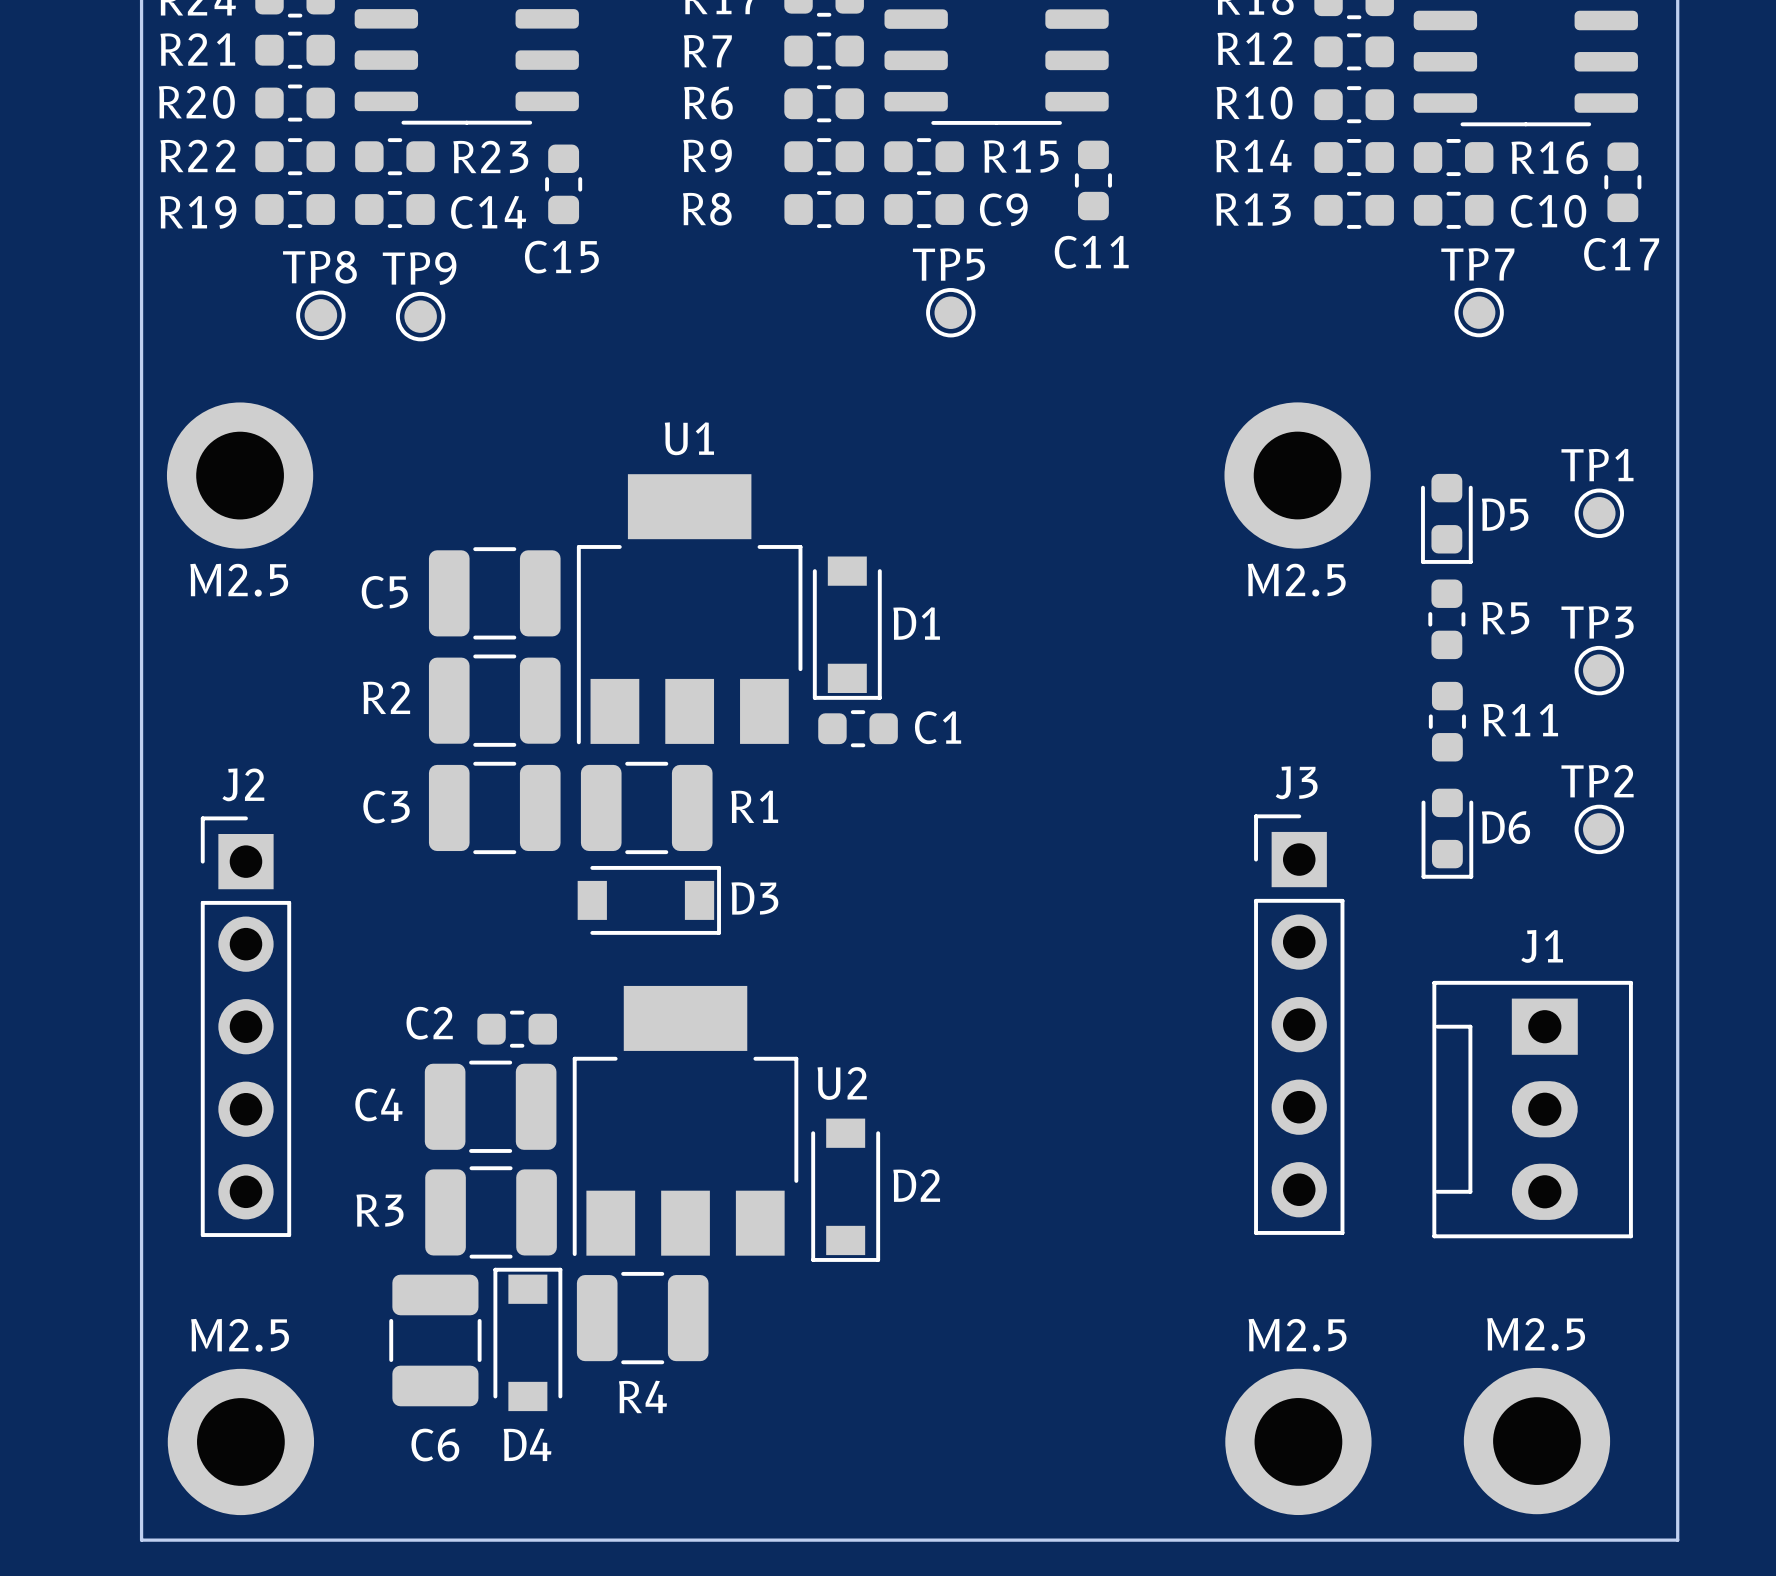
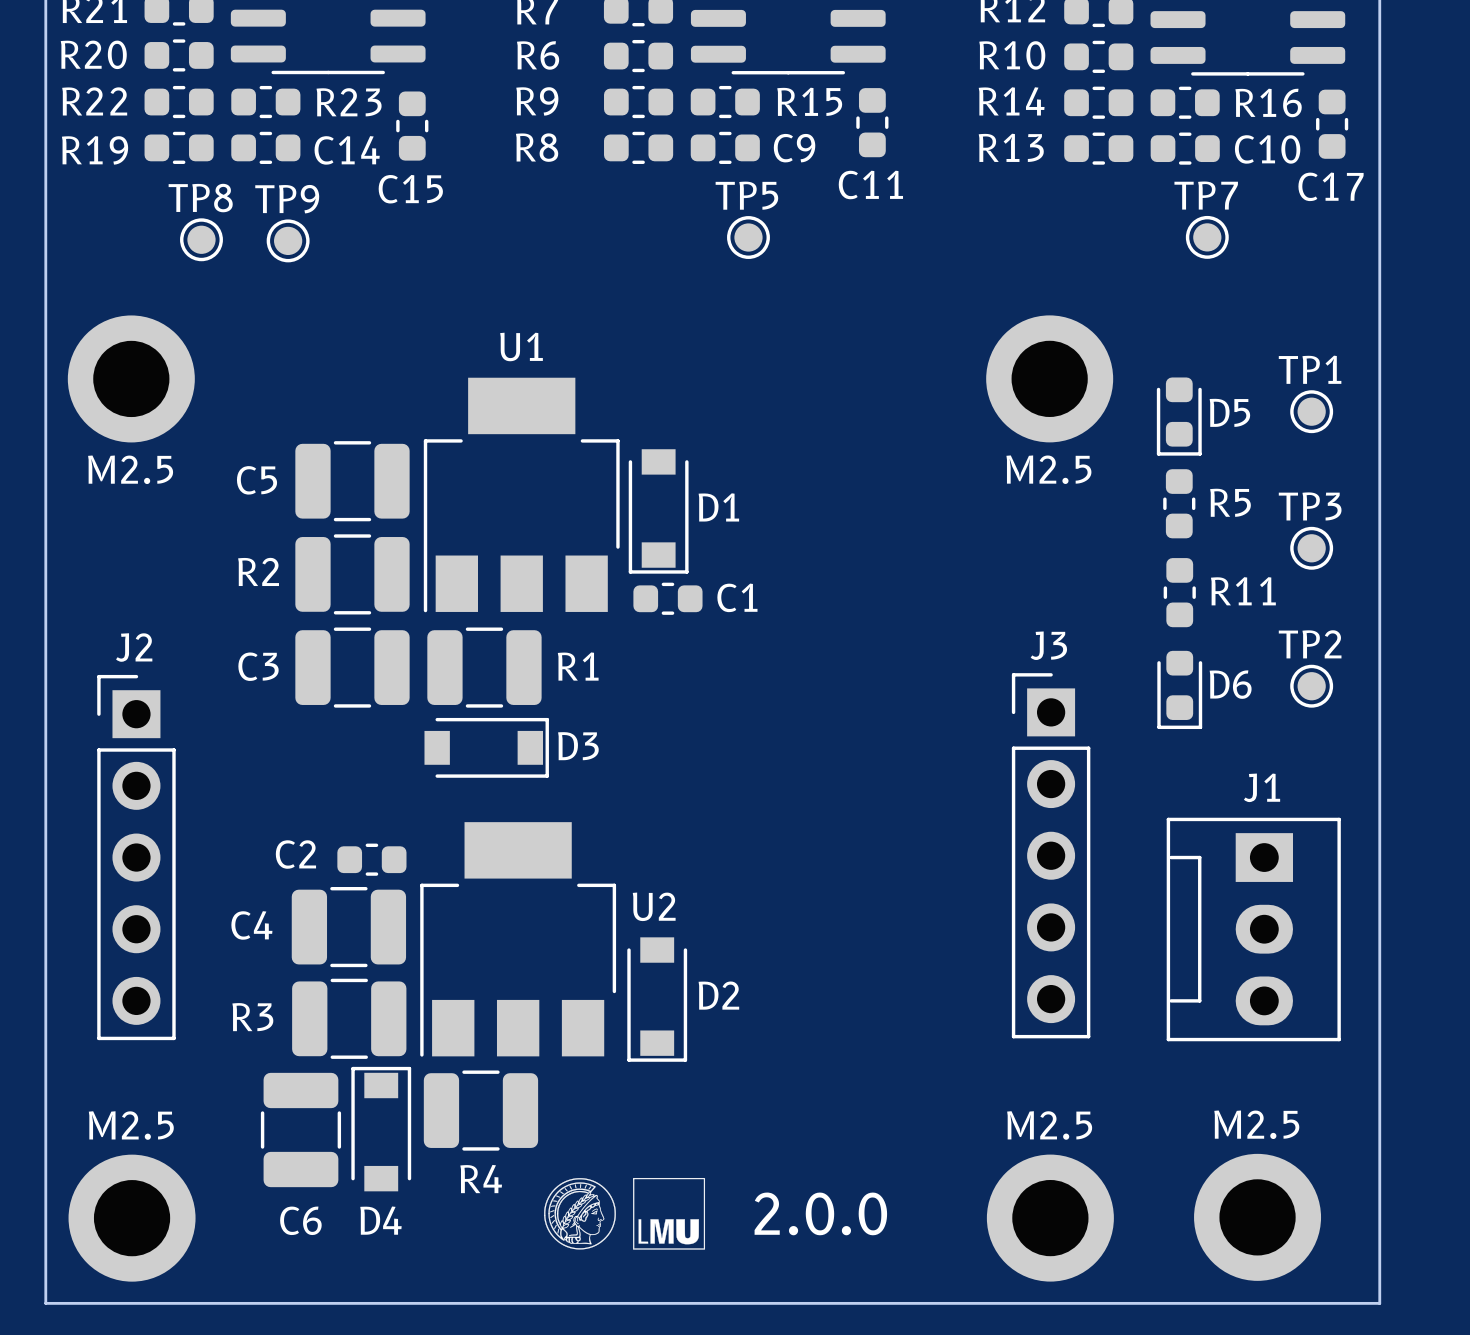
drawing: none -> [544, 1177, 706, 1250]
text: none -> 2.0.0 (820, 1213)

